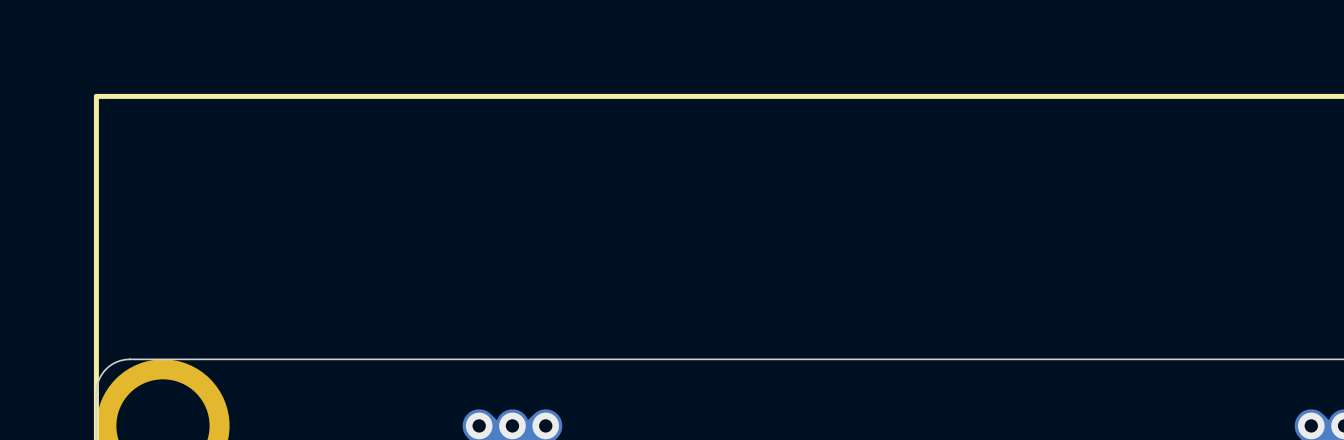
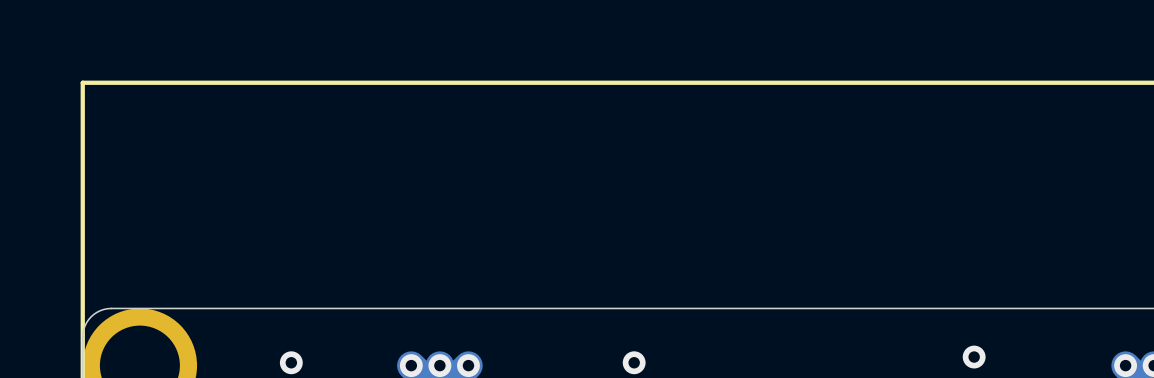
via: none -> (974, 357)
via: none -> (291, 362)
via: none -> (634, 362)

